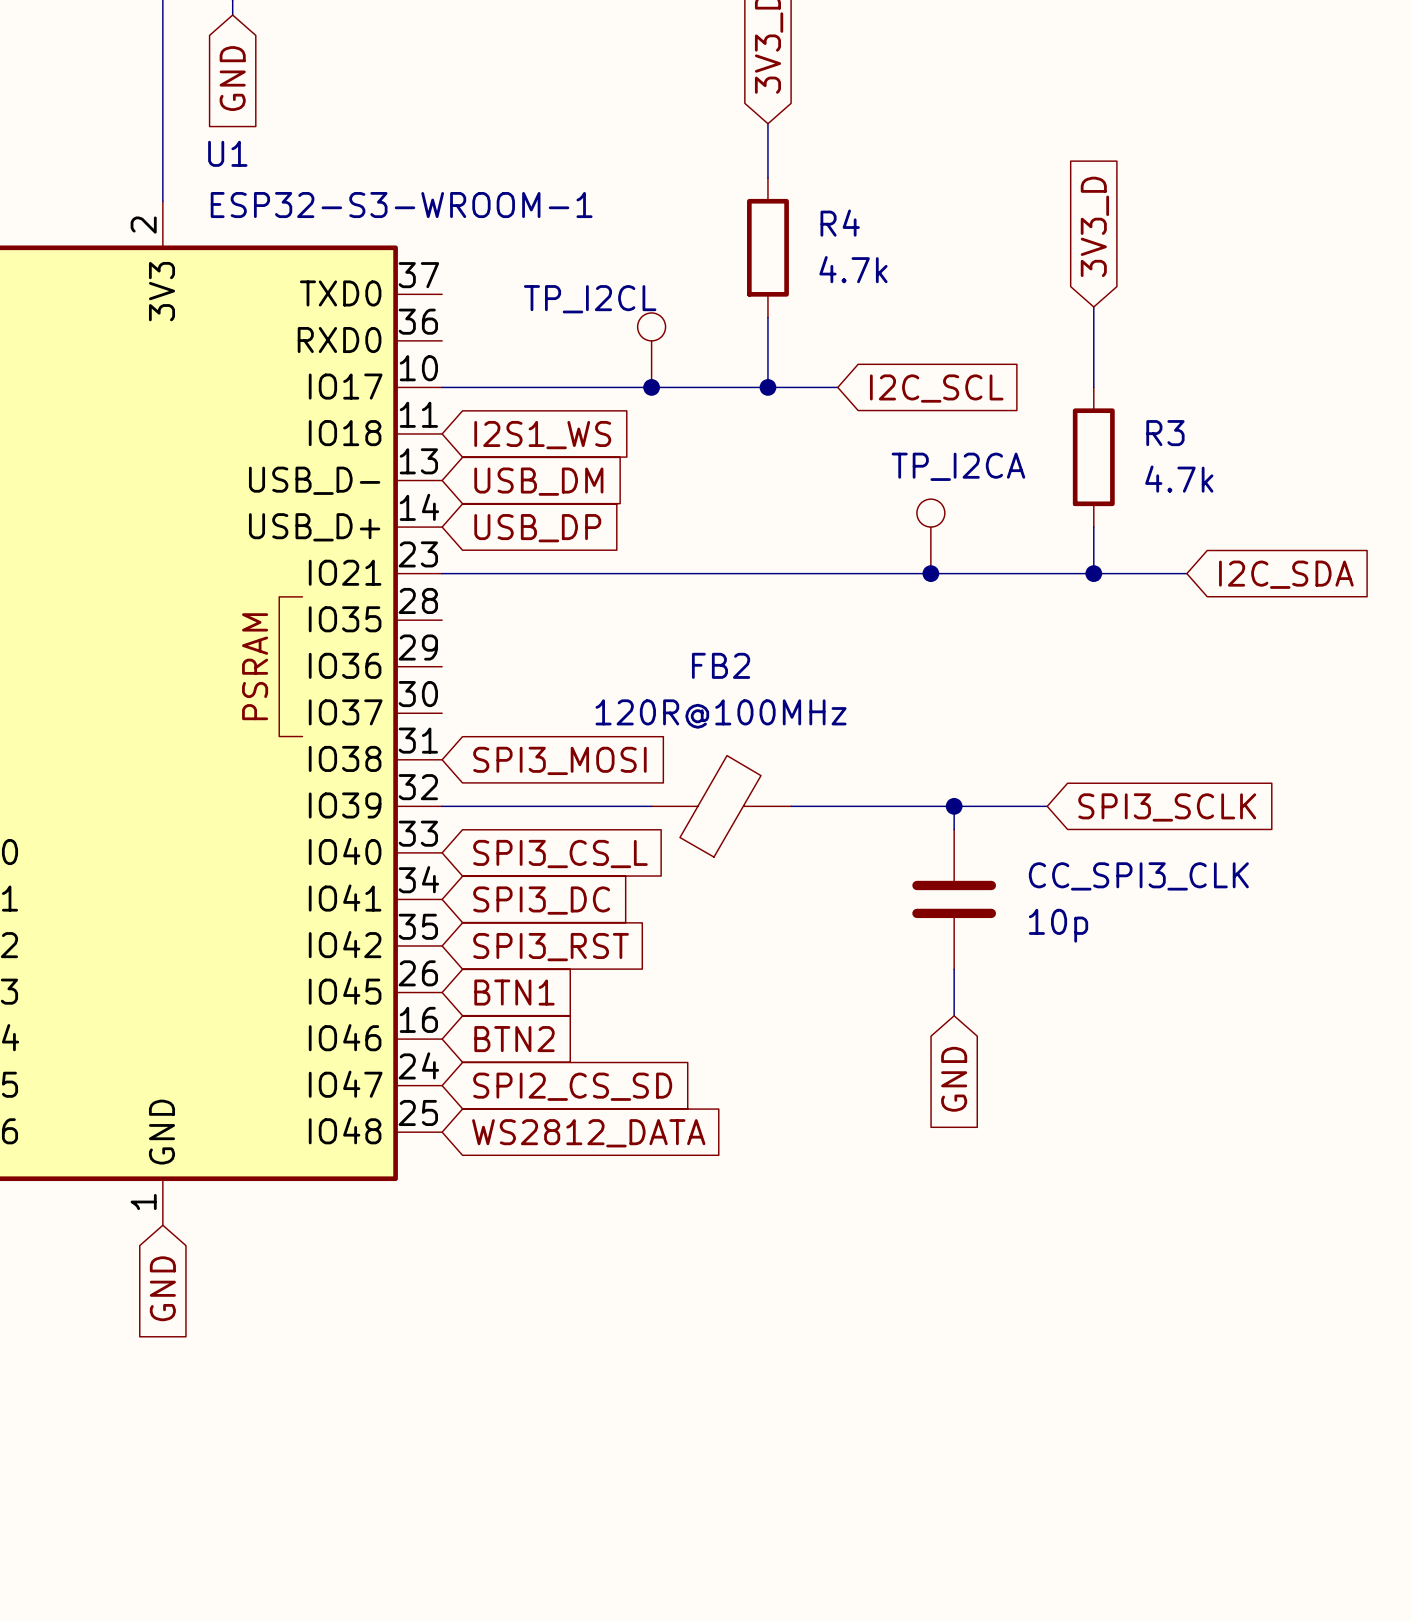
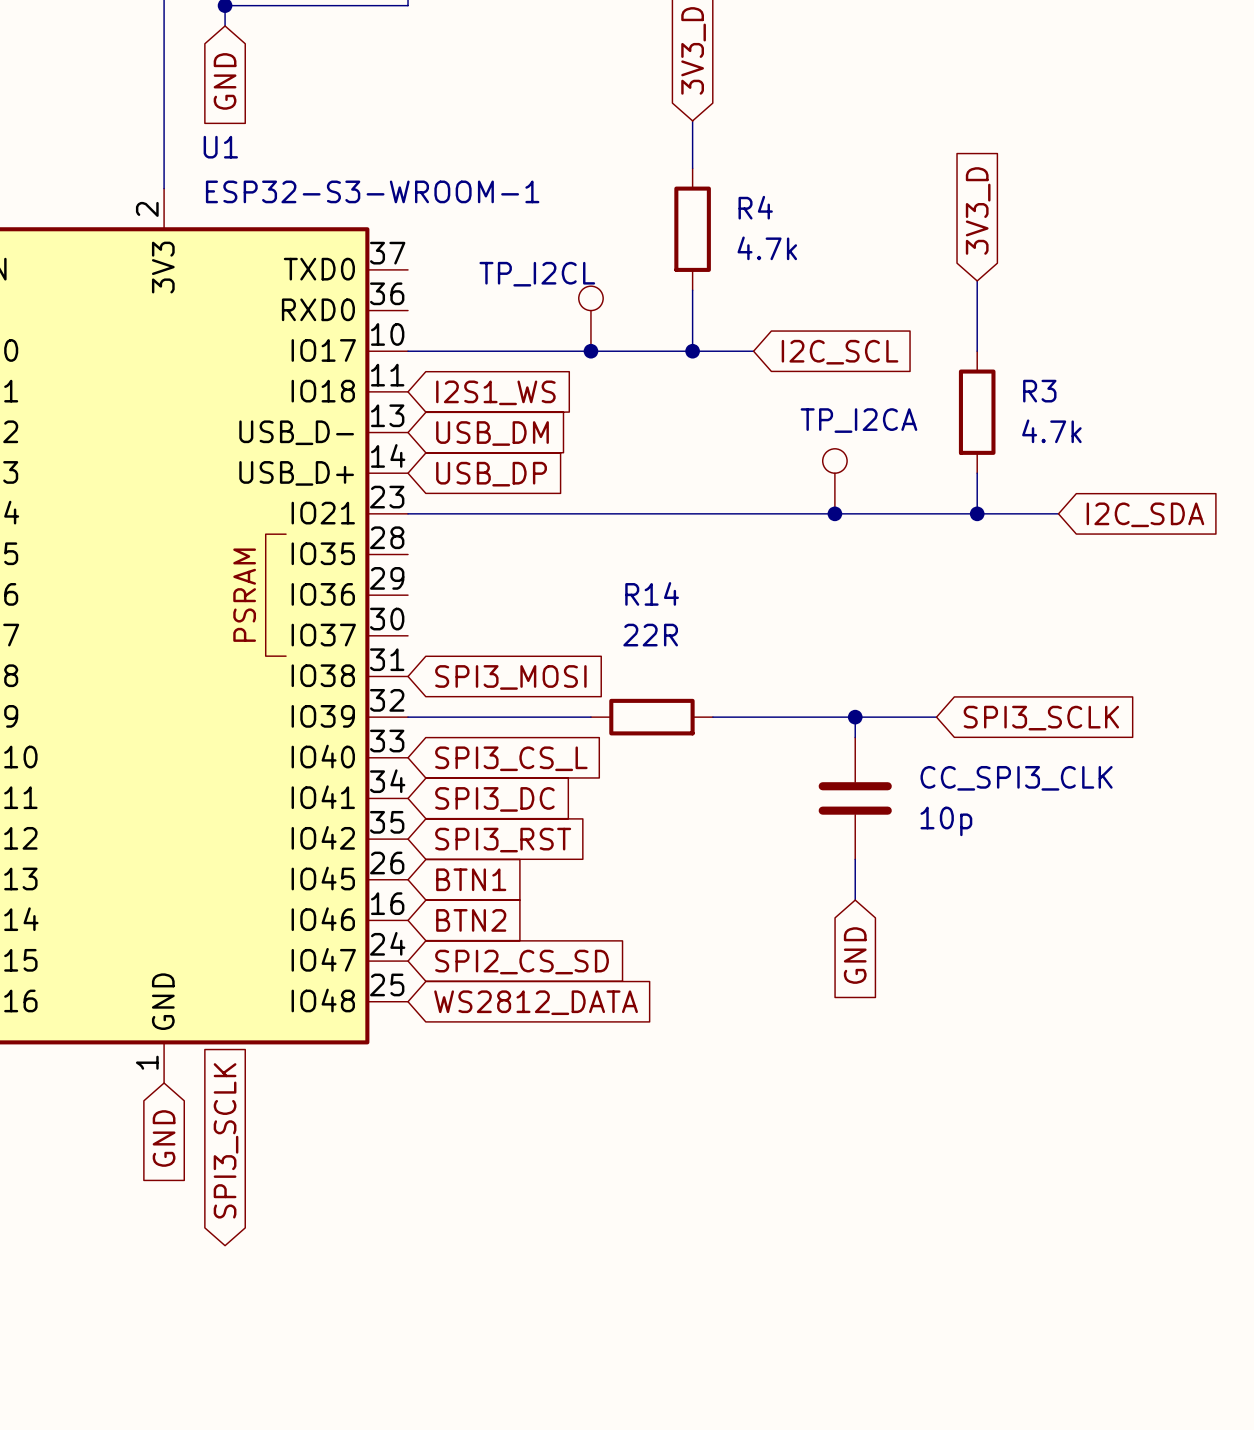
FB2: 120R@100MHz (721, 806) -> none
R14: none -> 22R (651, 717)
global label: none -> SPI3_SCLK (226, 1140)

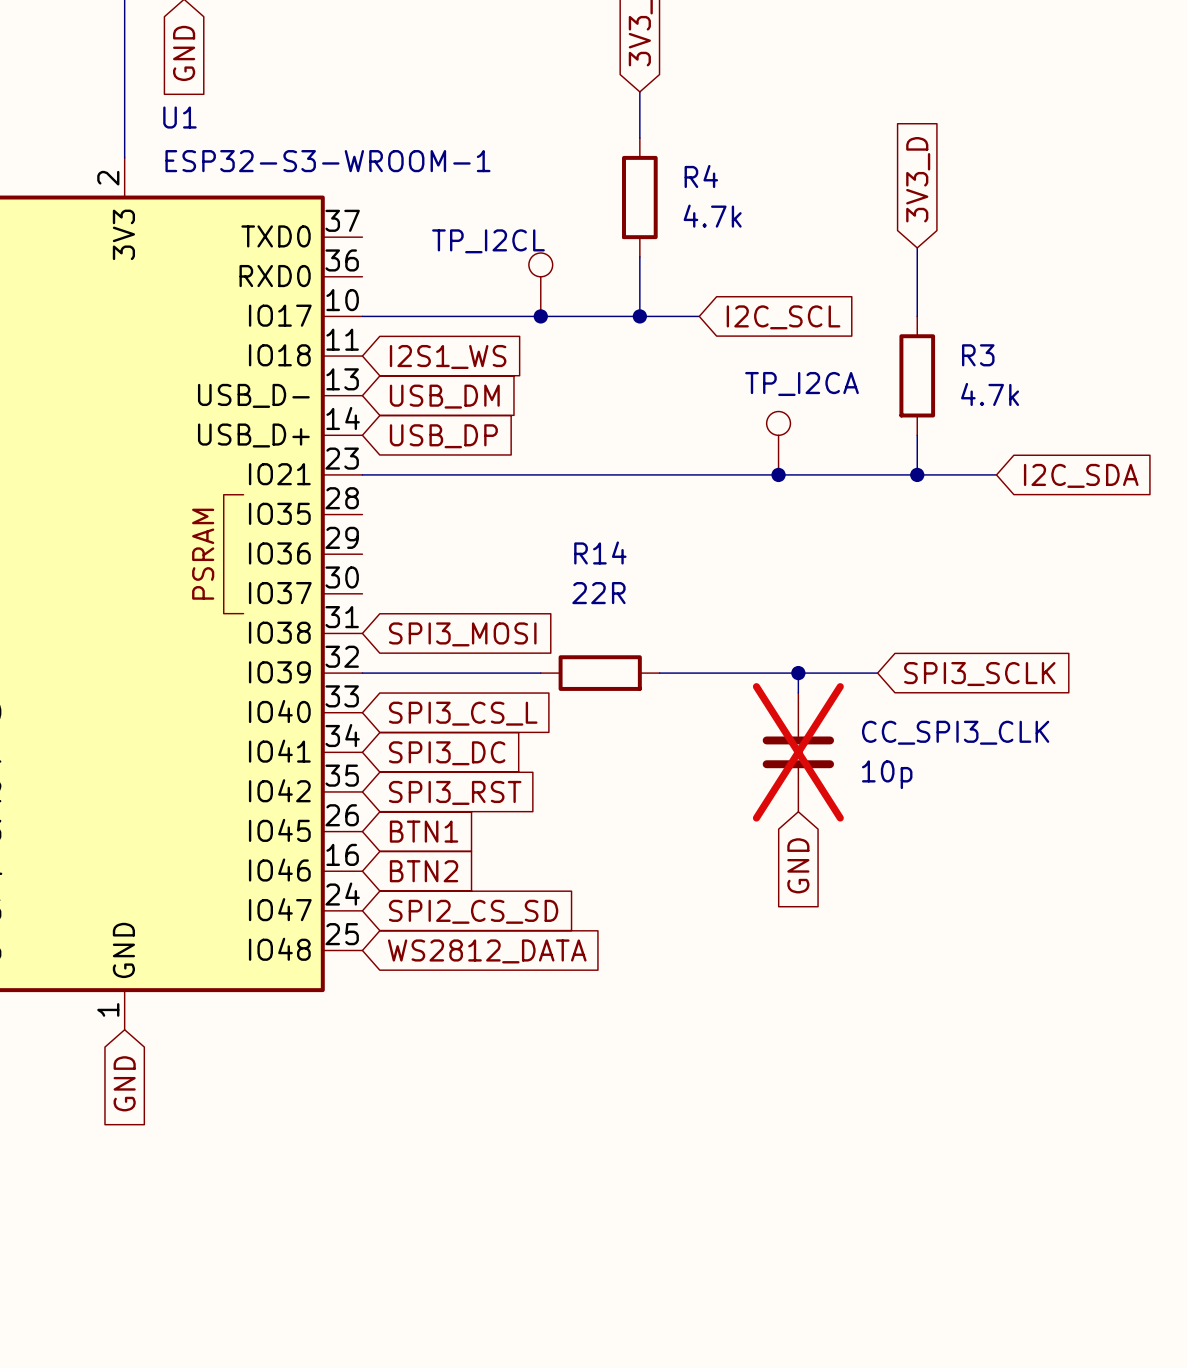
CC_SPI3_CLK do-not-place cross: none -> (798, 752)
wire: (855, 859) (855, 900) -> none
global label position: GND (855, 955) -> GND (798, 865)
global label: SPI3_SCLK (226, 1140) -> none

